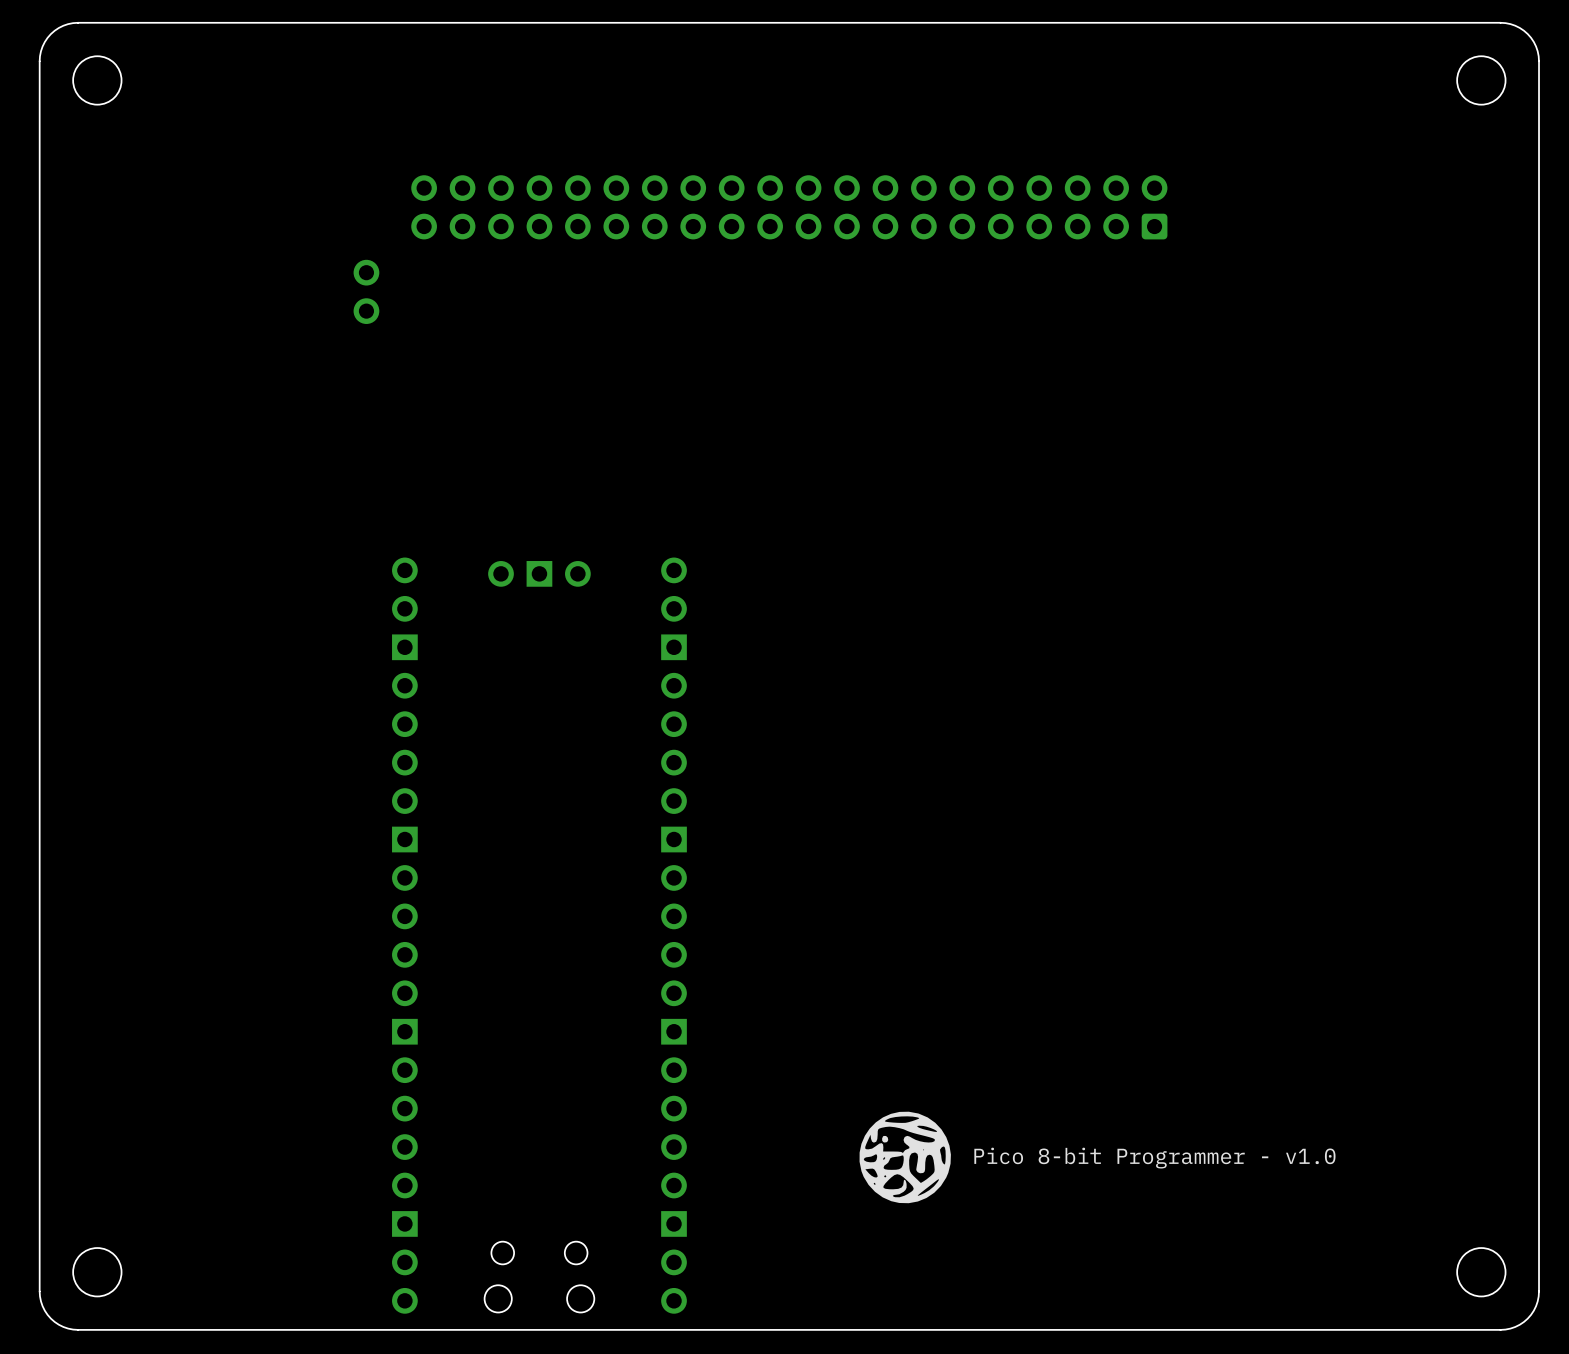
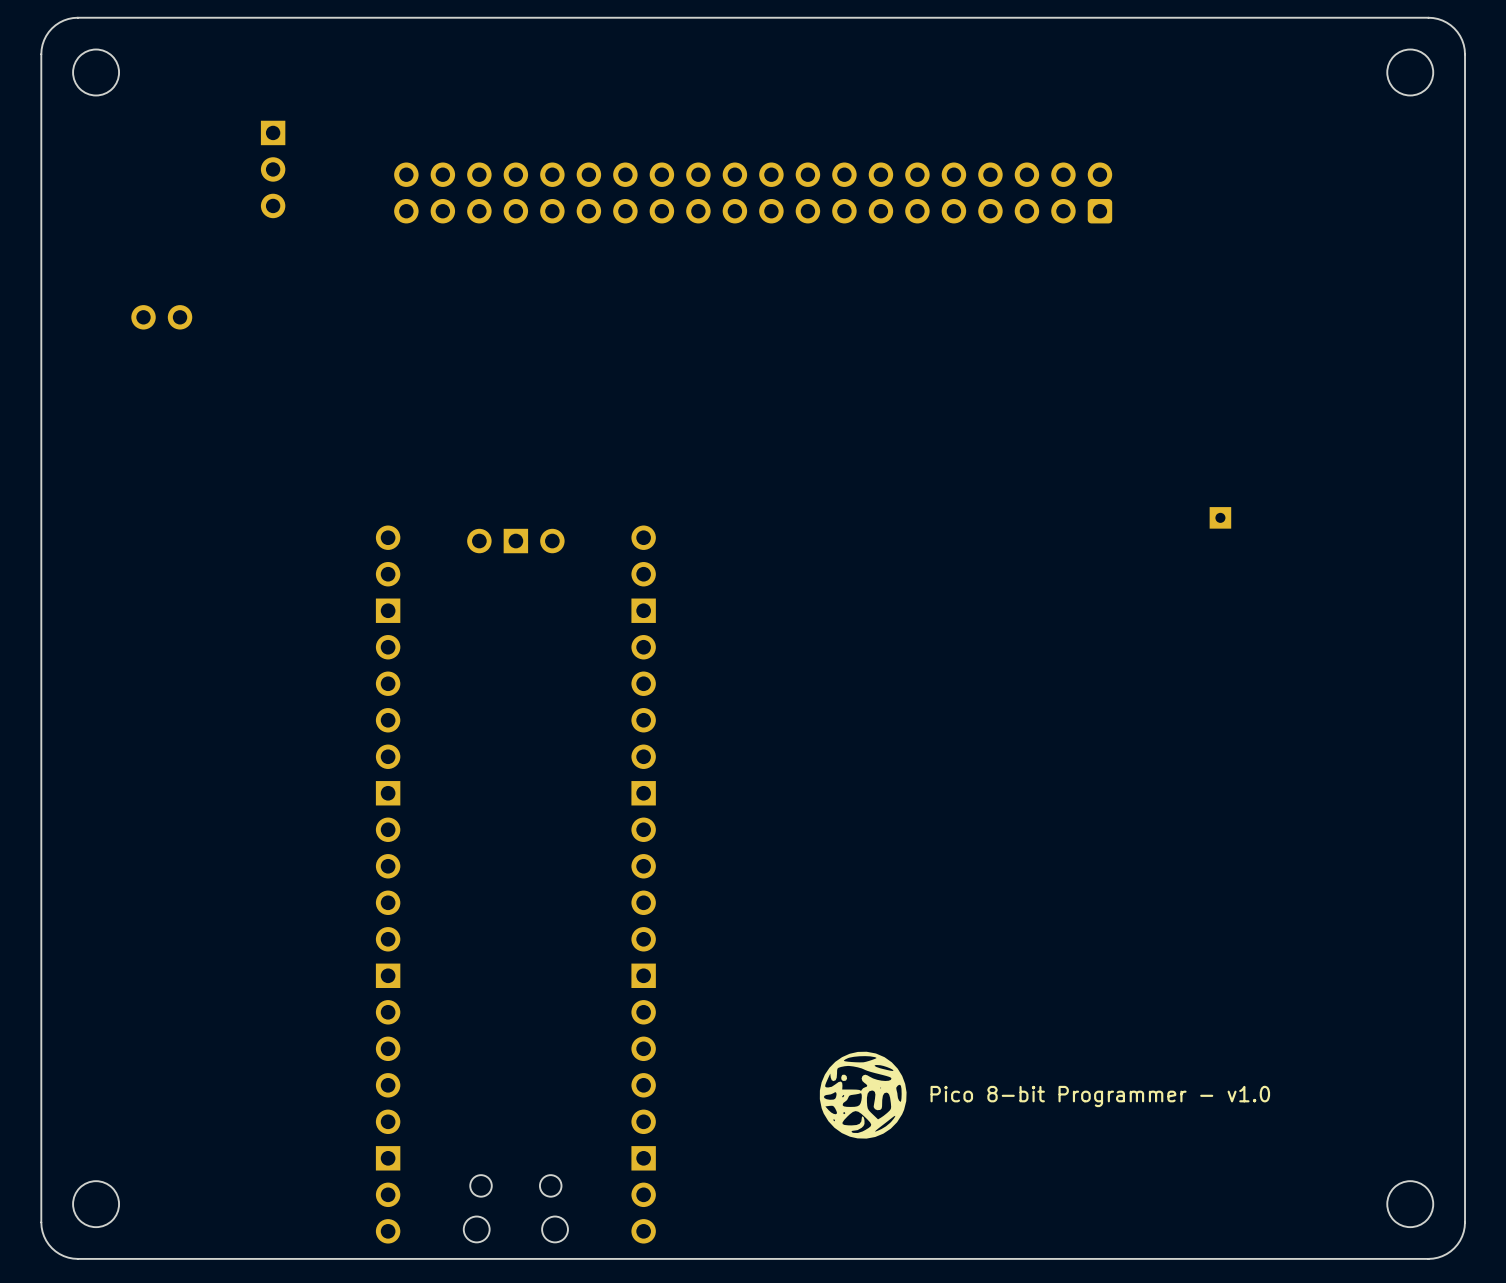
part: none -> (273, 169)
part rotation: 0° (366, 291) -> 90° clockwise (161, 317)
part position: (366, 291) -> (161, 317)
part: none -> (1220, 517)

